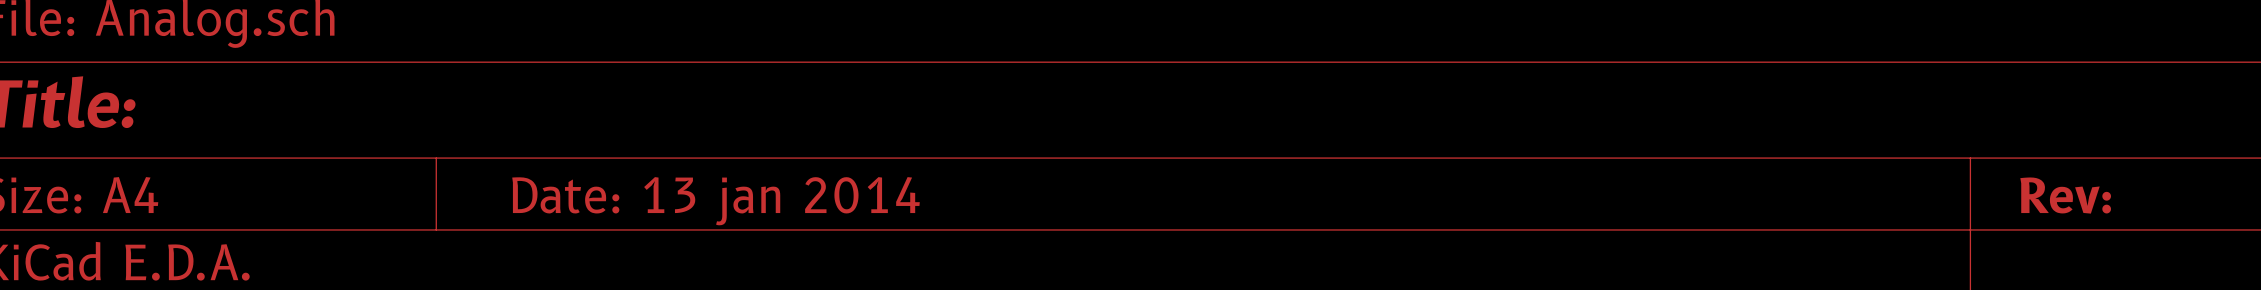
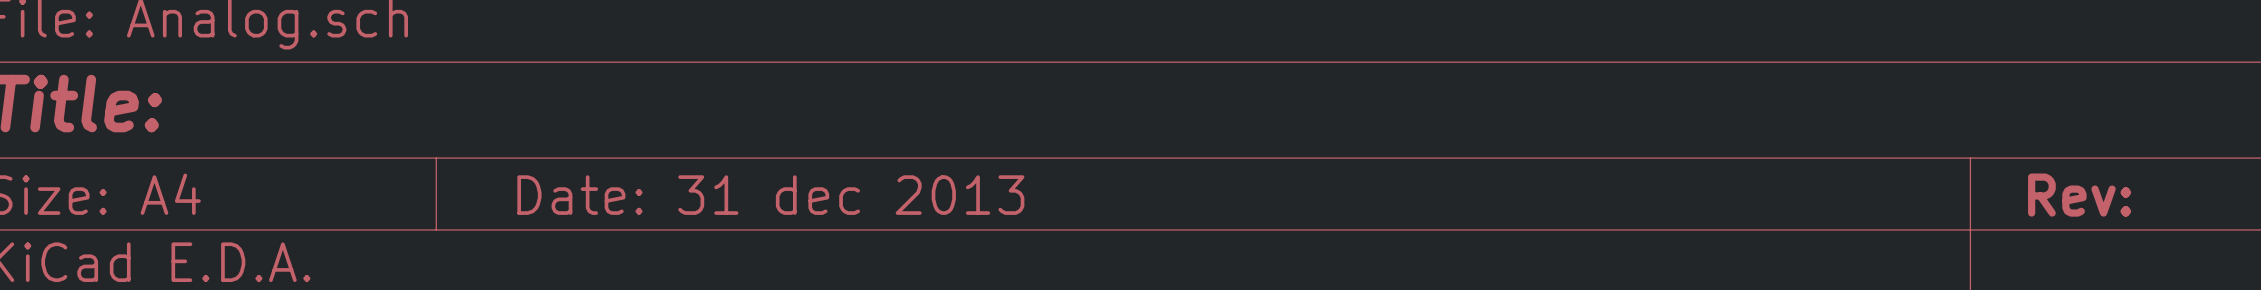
title block: Date: 13 jan 2014 (716, 201) -> Date: 31 dec 2013 (770, 195)

